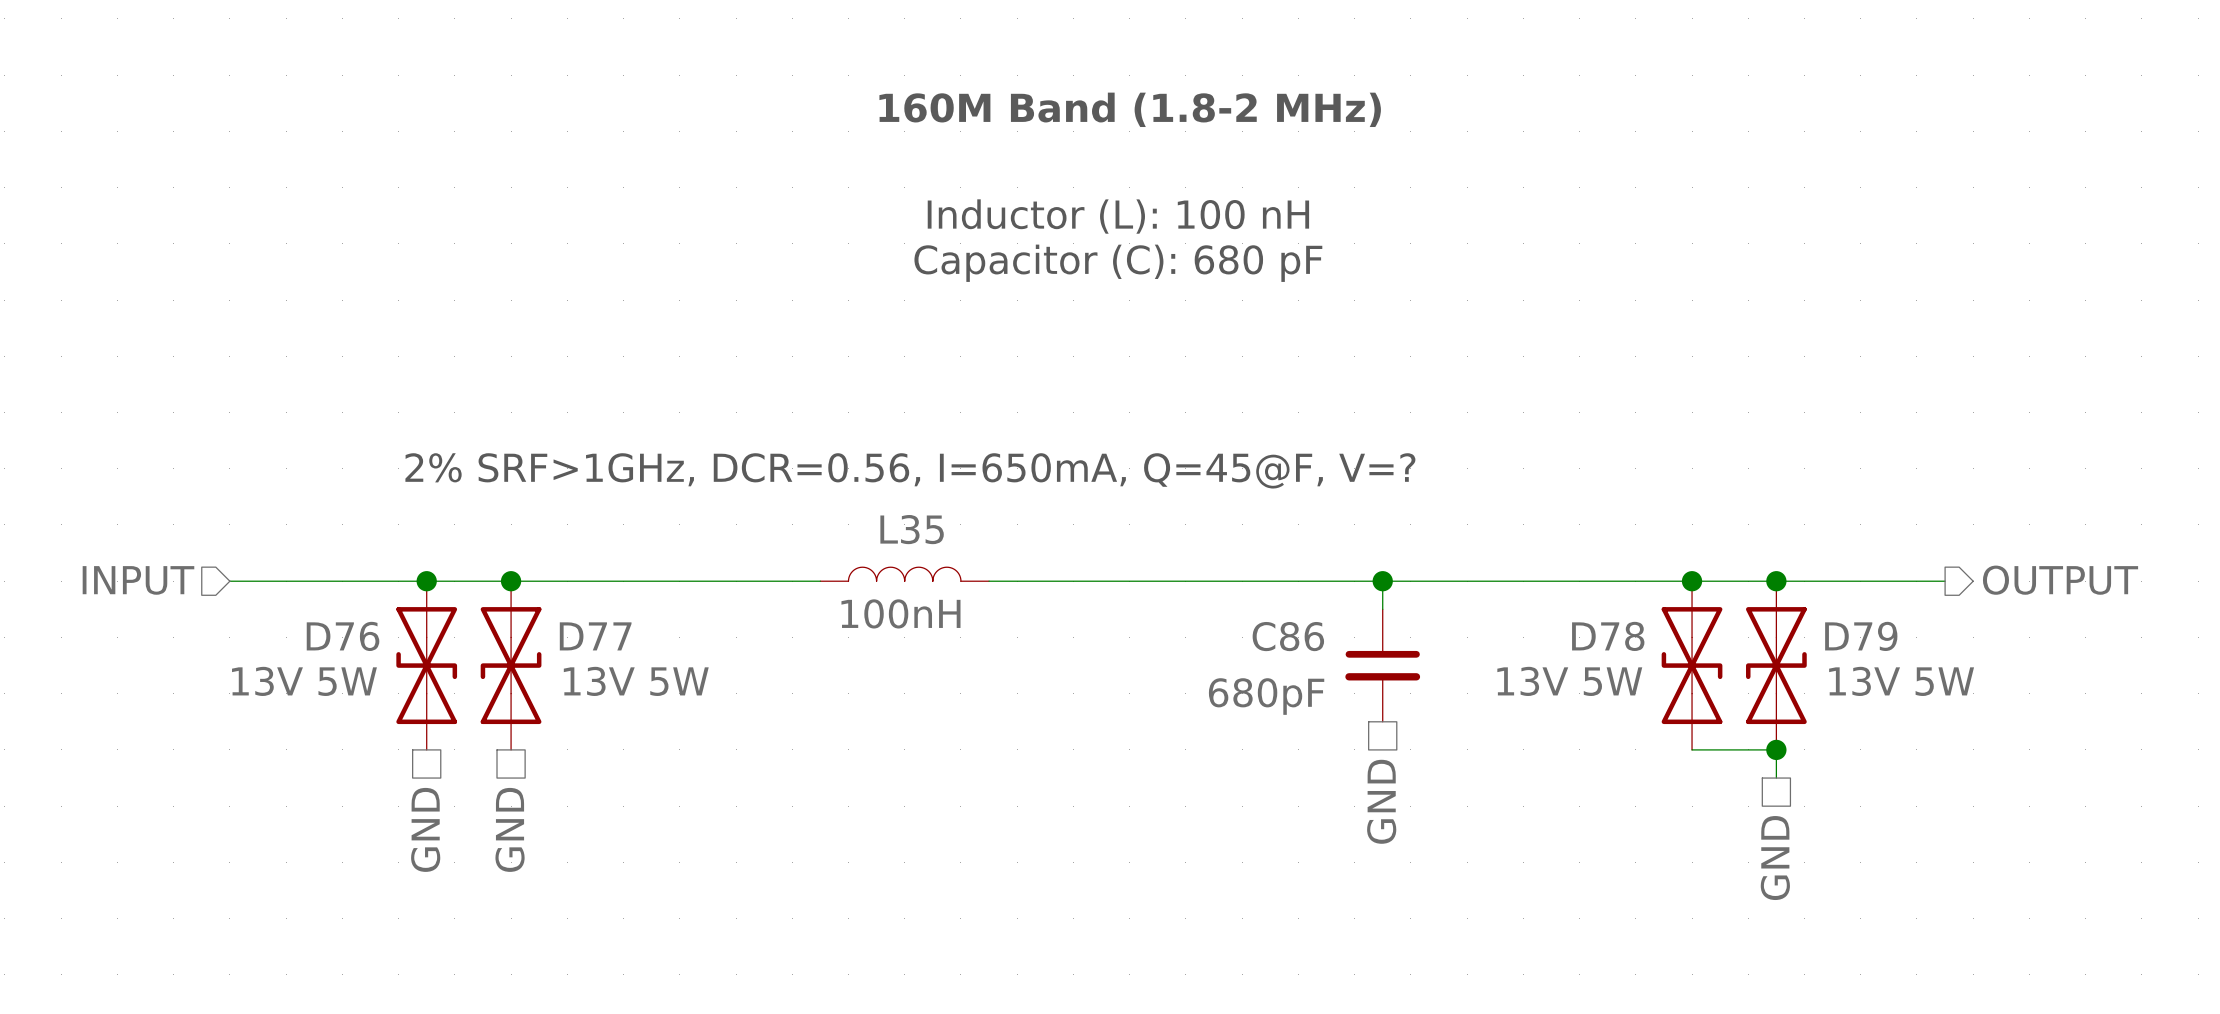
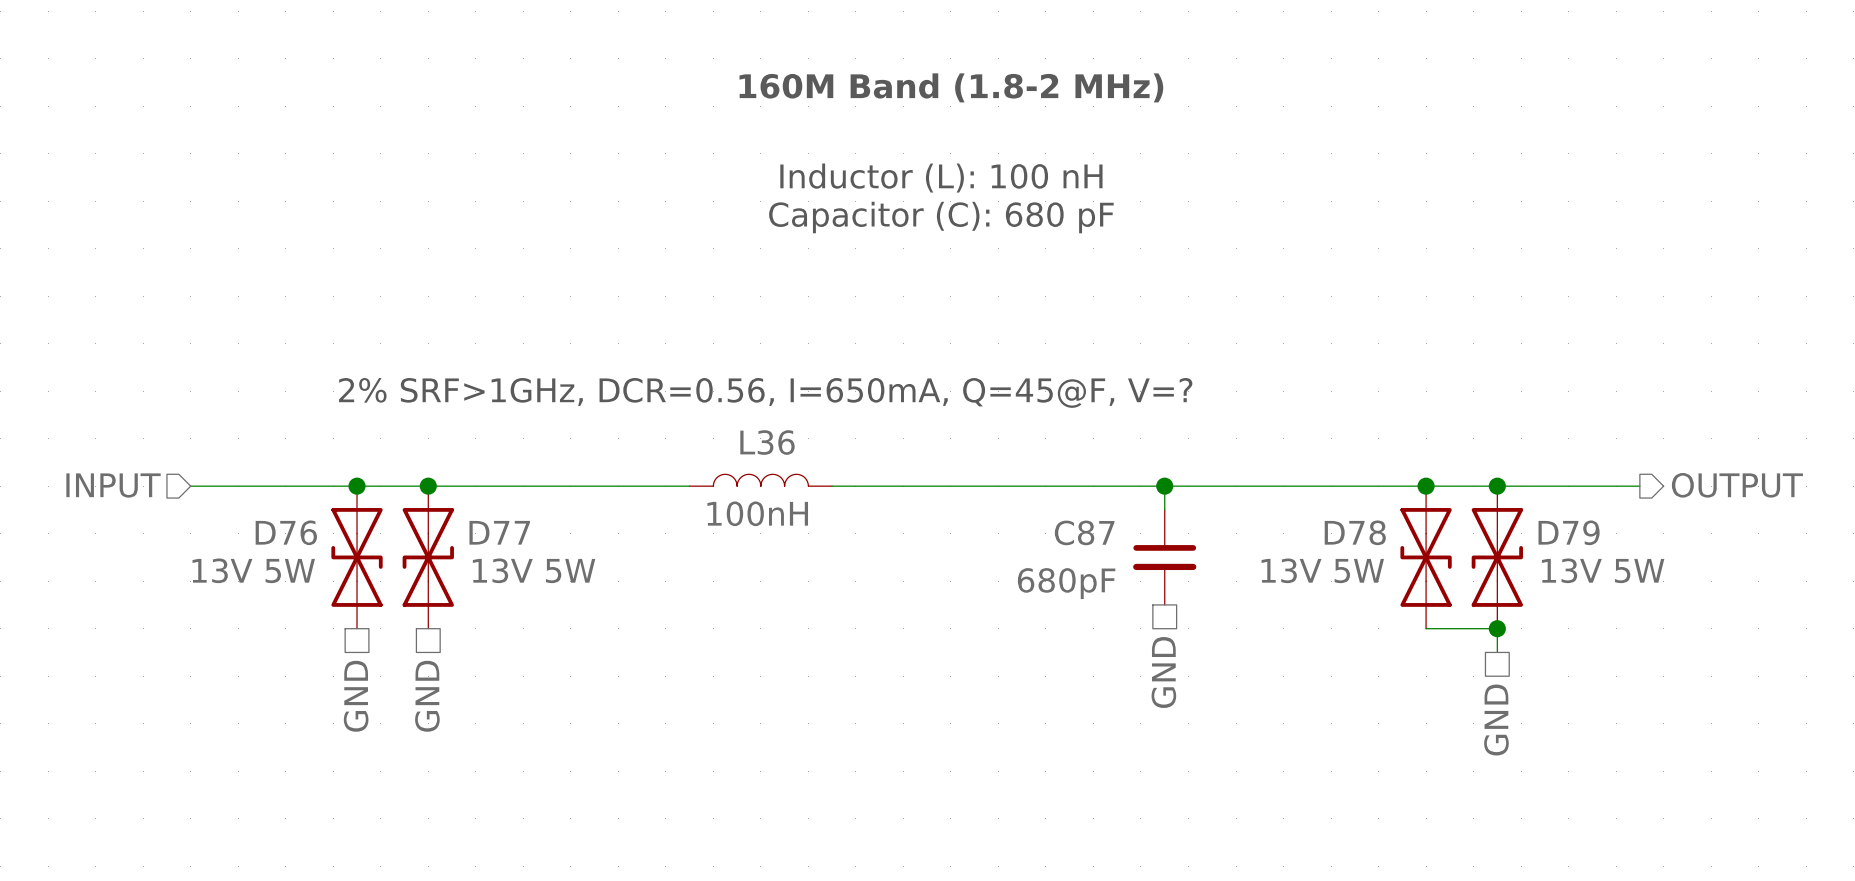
L35 name: L35 (912, 529) -> L36 (767, 442)
C86 name: C86 (1288, 636) -> C87 (1084, 532)

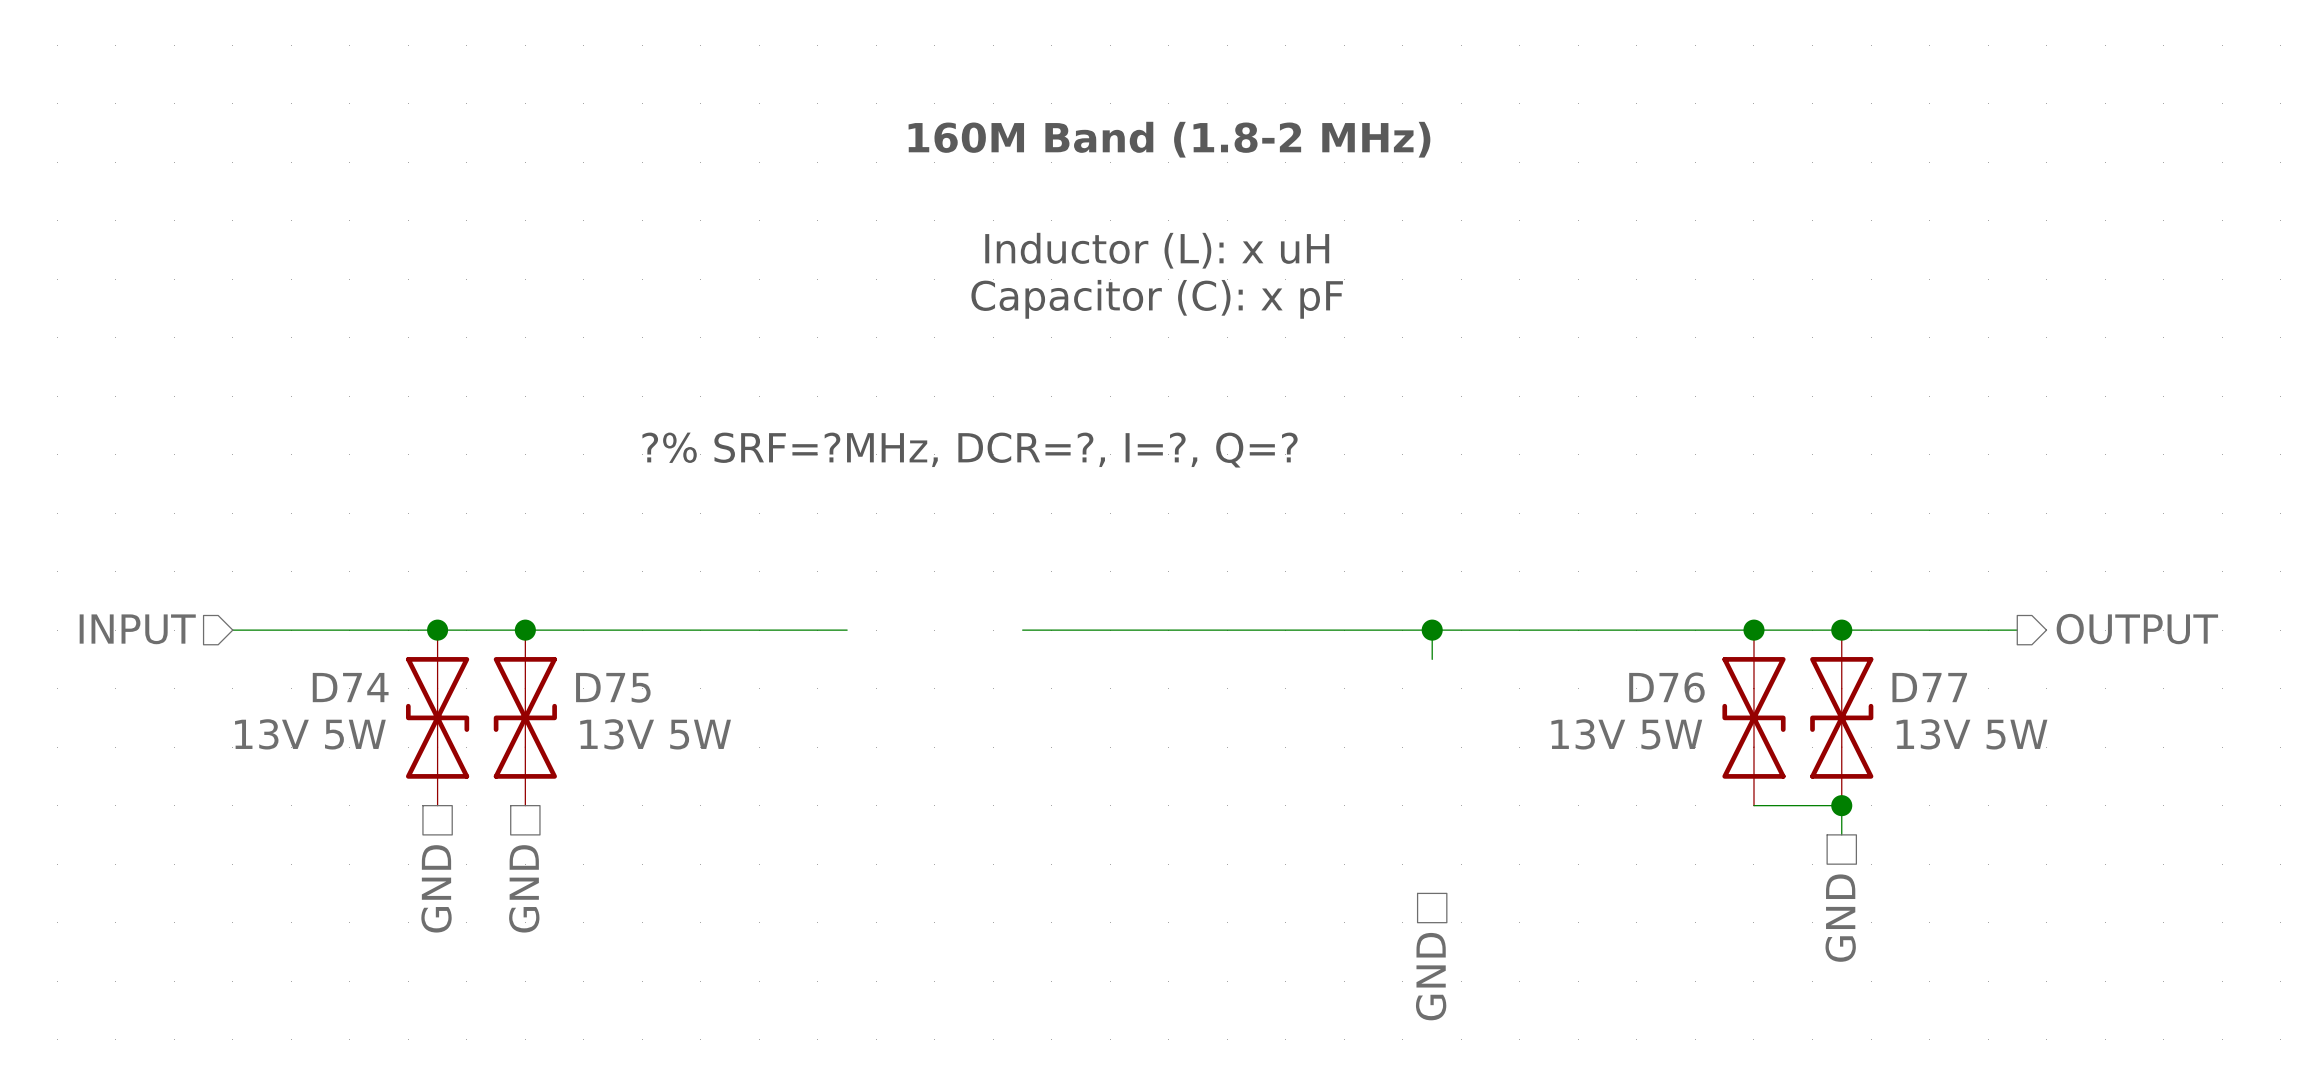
text: Inductor (L): 100 nH (941, 178) -> Inductor (L): x uH (1157, 250)
text: Capacitor (C): 680 pF (941, 217) -> Capacitor (C): x pF (1157, 299)
text: none -> ?% SRF=?MHz, DCR=?, I=?, Q=? (970, 450)
text: 2% SRF>1GHz, DCR=0.56, I=650mA, Q=45@F, V=? (765, 392) -> none
L36: 100nH (760, 480) -> none
D76 name: D76 (286, 532) -> D74 (350, 687)
D77 name: D77 (499, 532) -> D75 (613, 687)
D78 name: D78 (1355, 532) -> D76 (1666, 687)
D79 name: D79 (1569, 532) -> D77 (1929, 687)
C87: 680pF (1164, 557) -> none
hierarchical label position: GND (1163, 672) -> GND (1431, 976)

